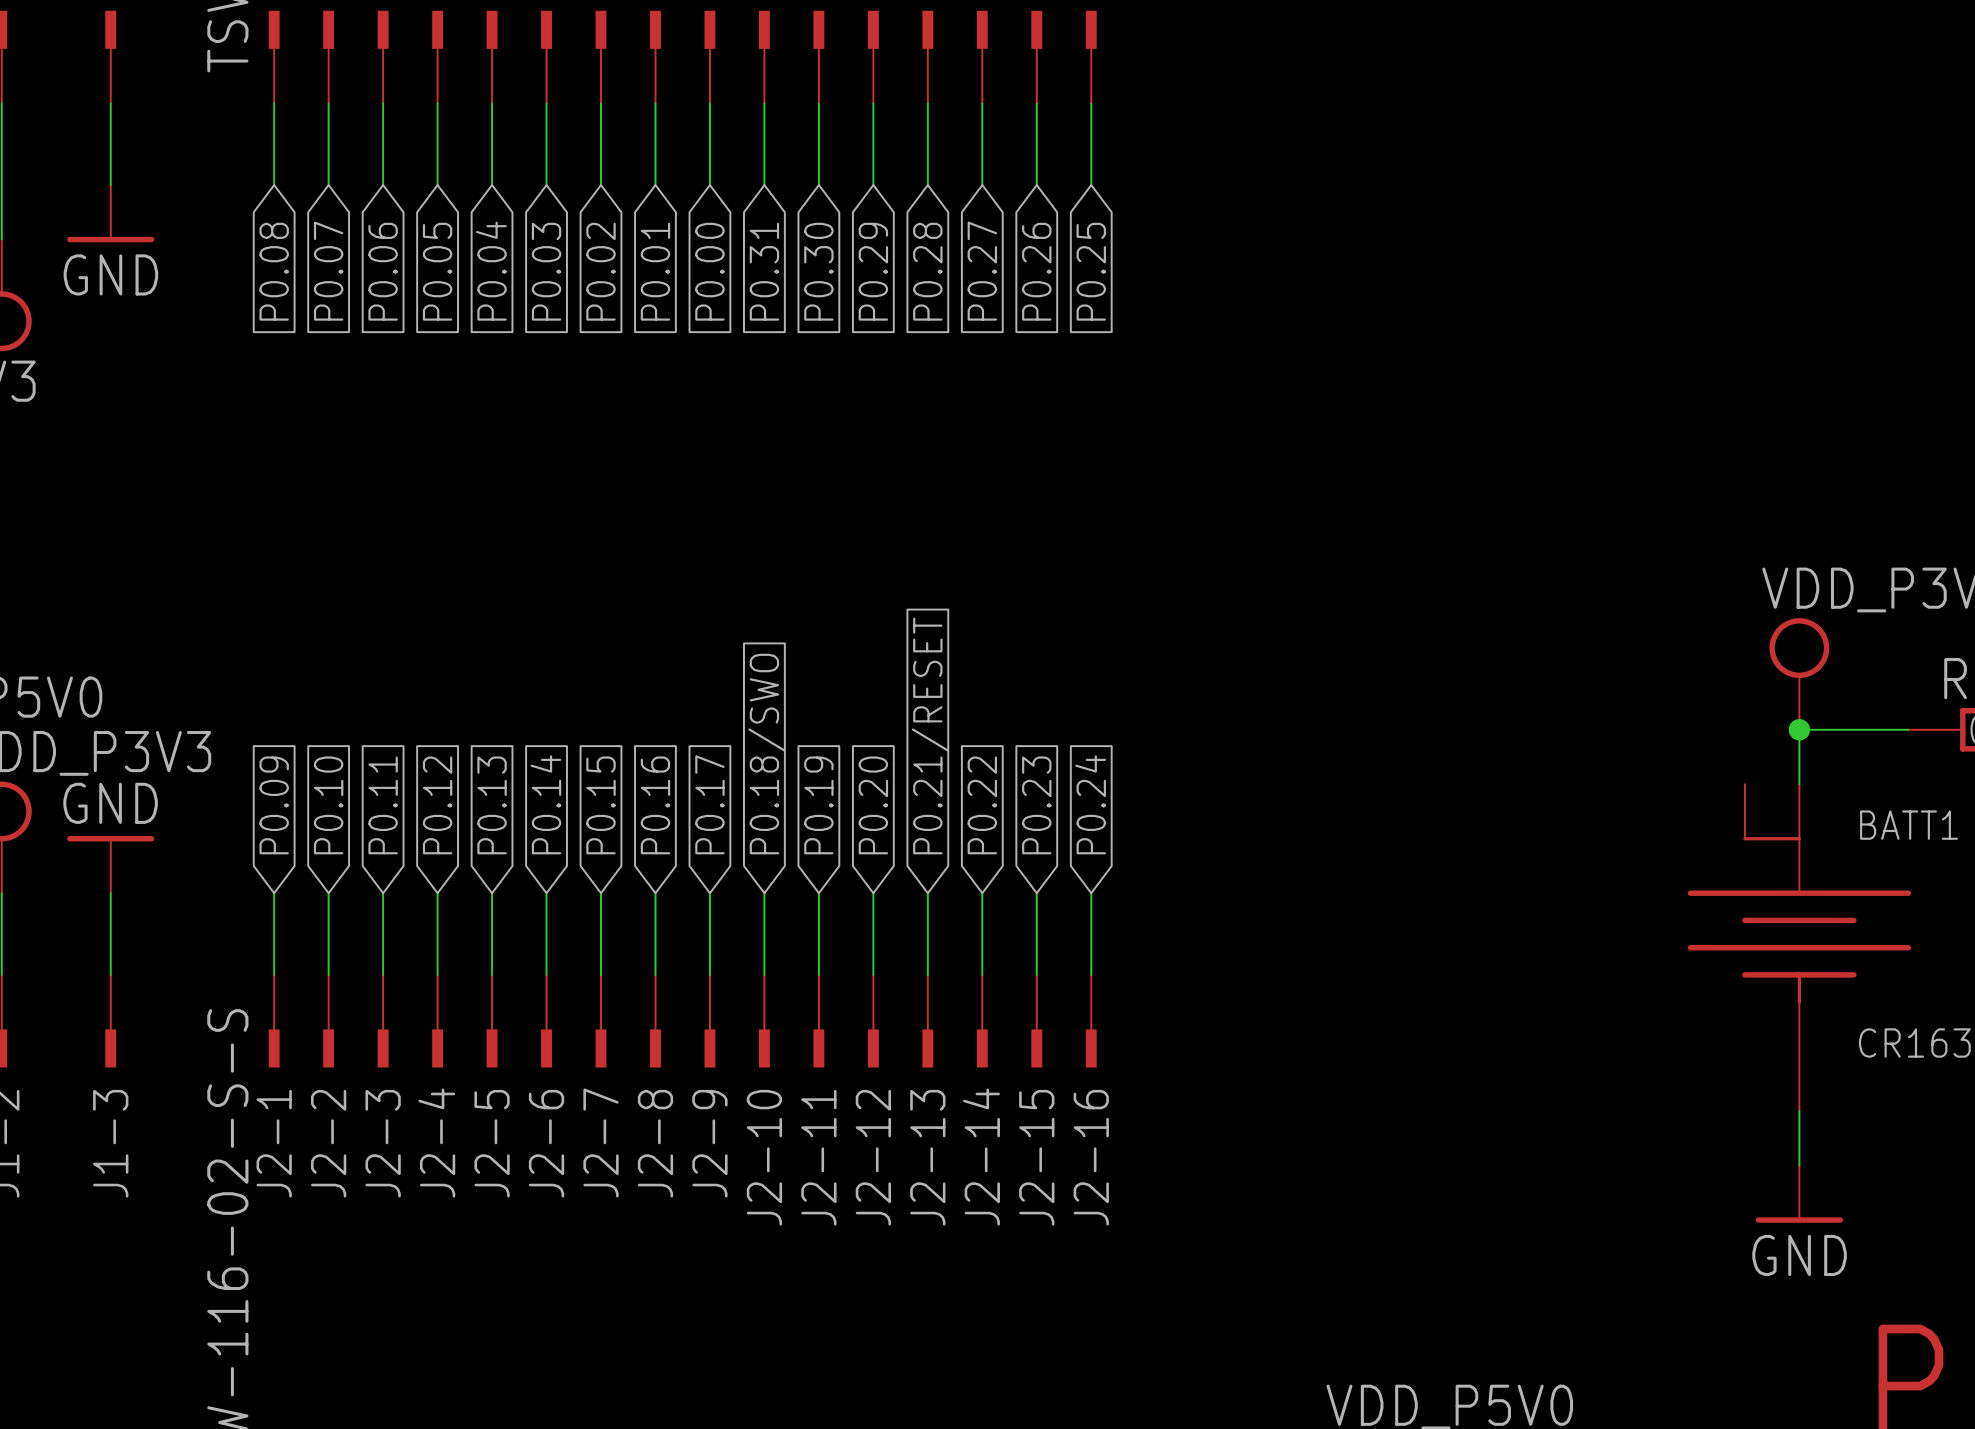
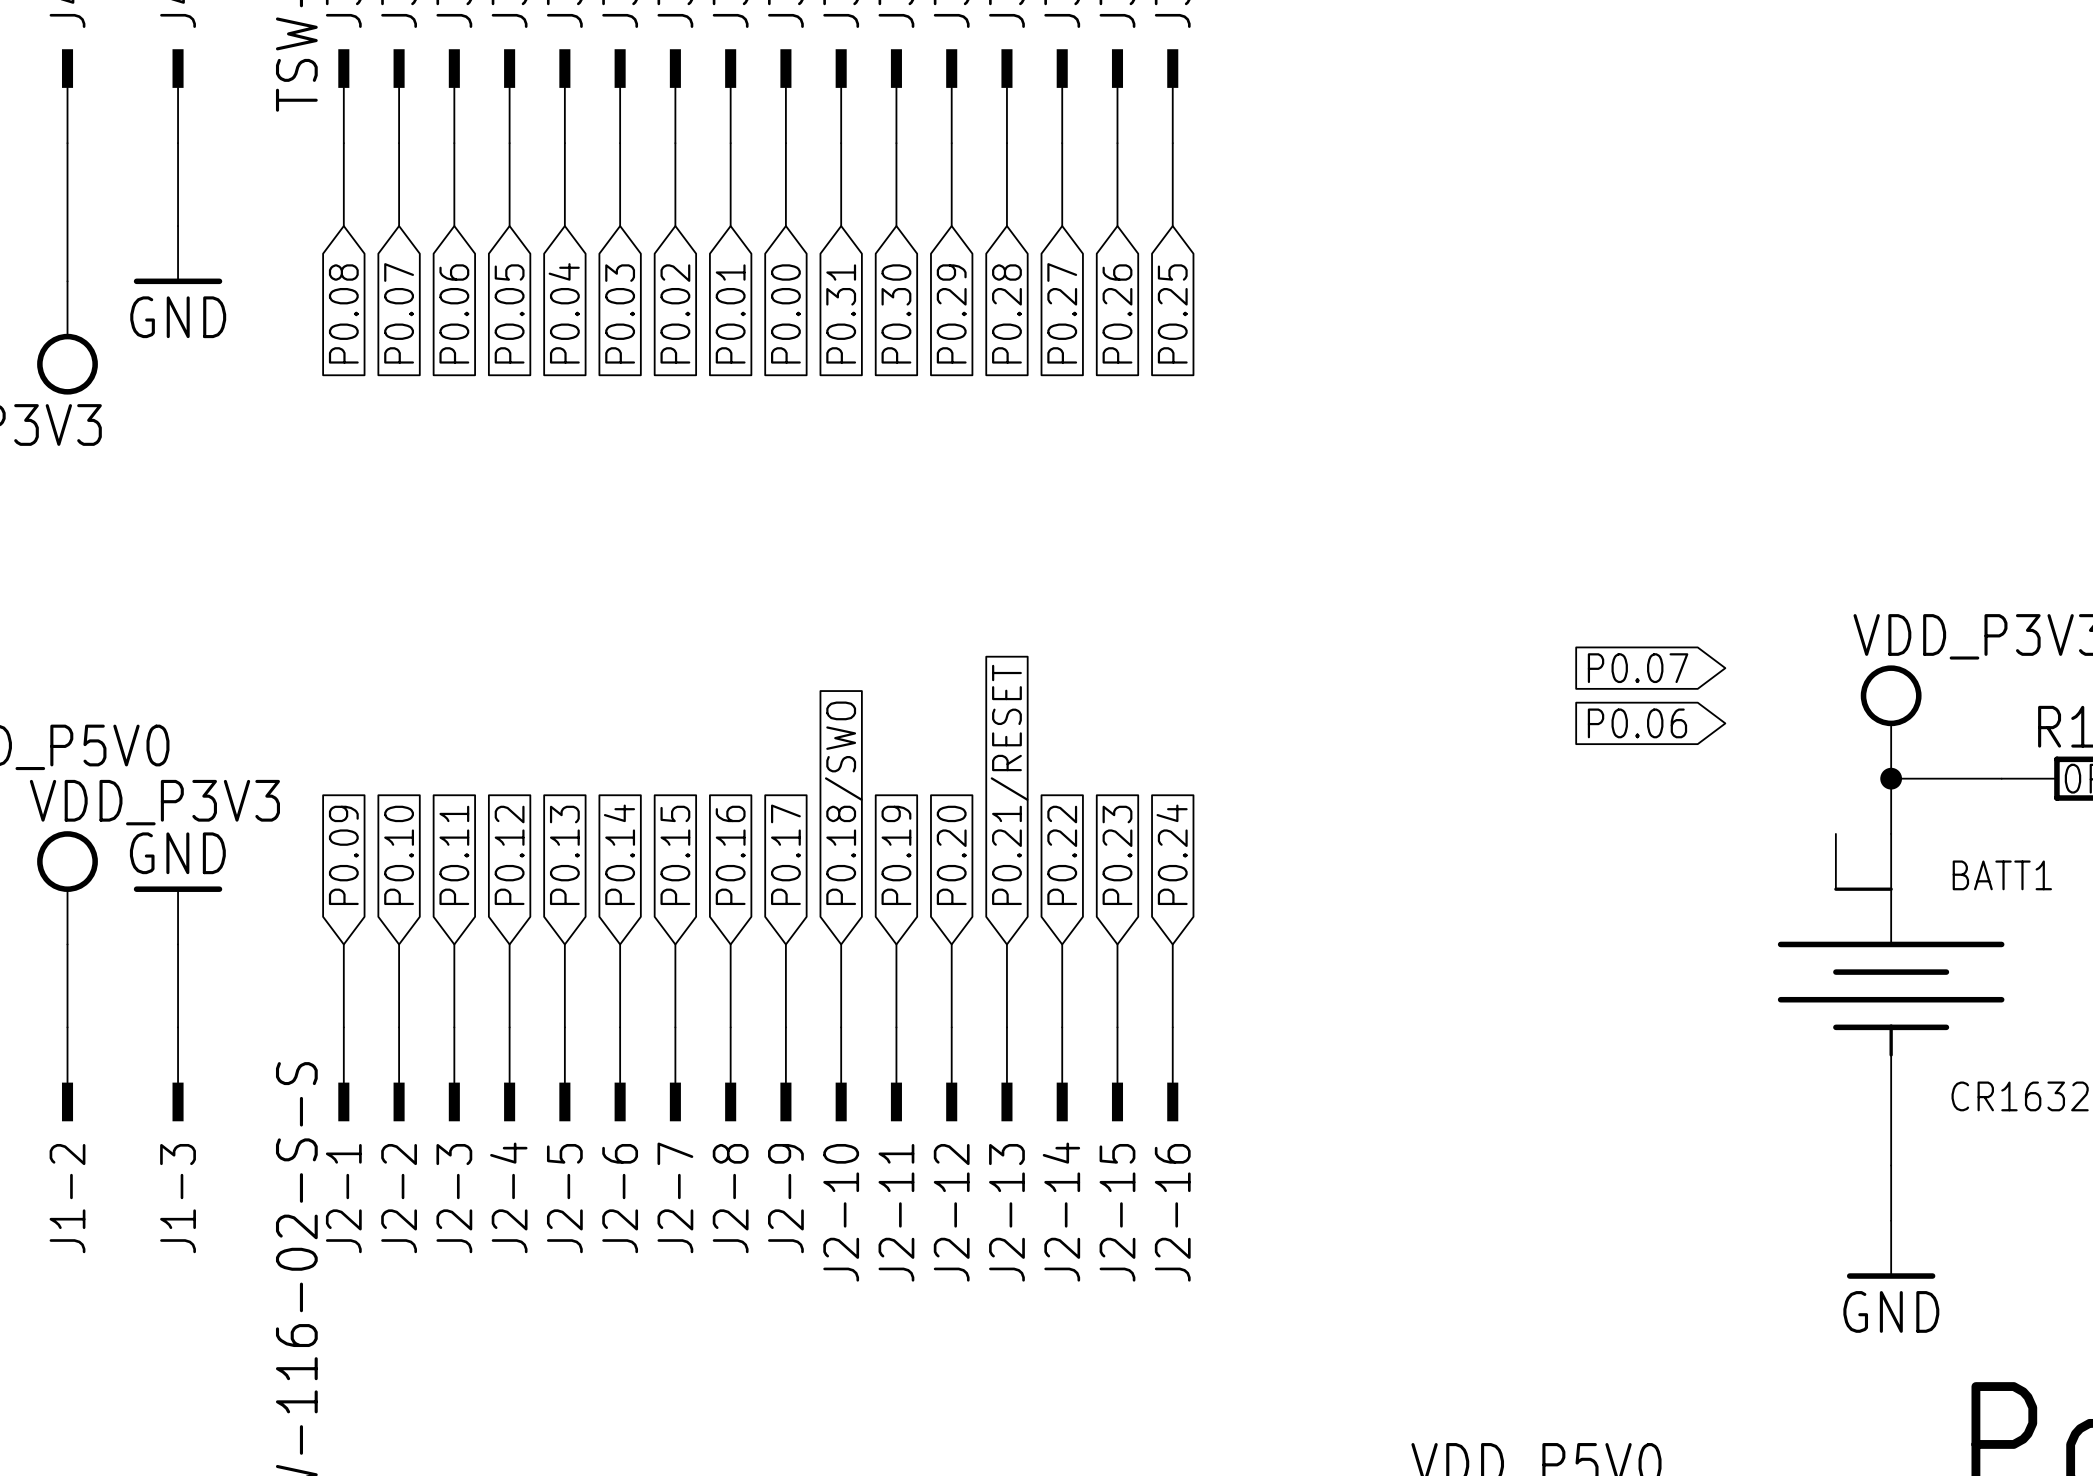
global label: none -> P0.07 (1638, 668)
global label: none -> P0.06 (1637, 723)

